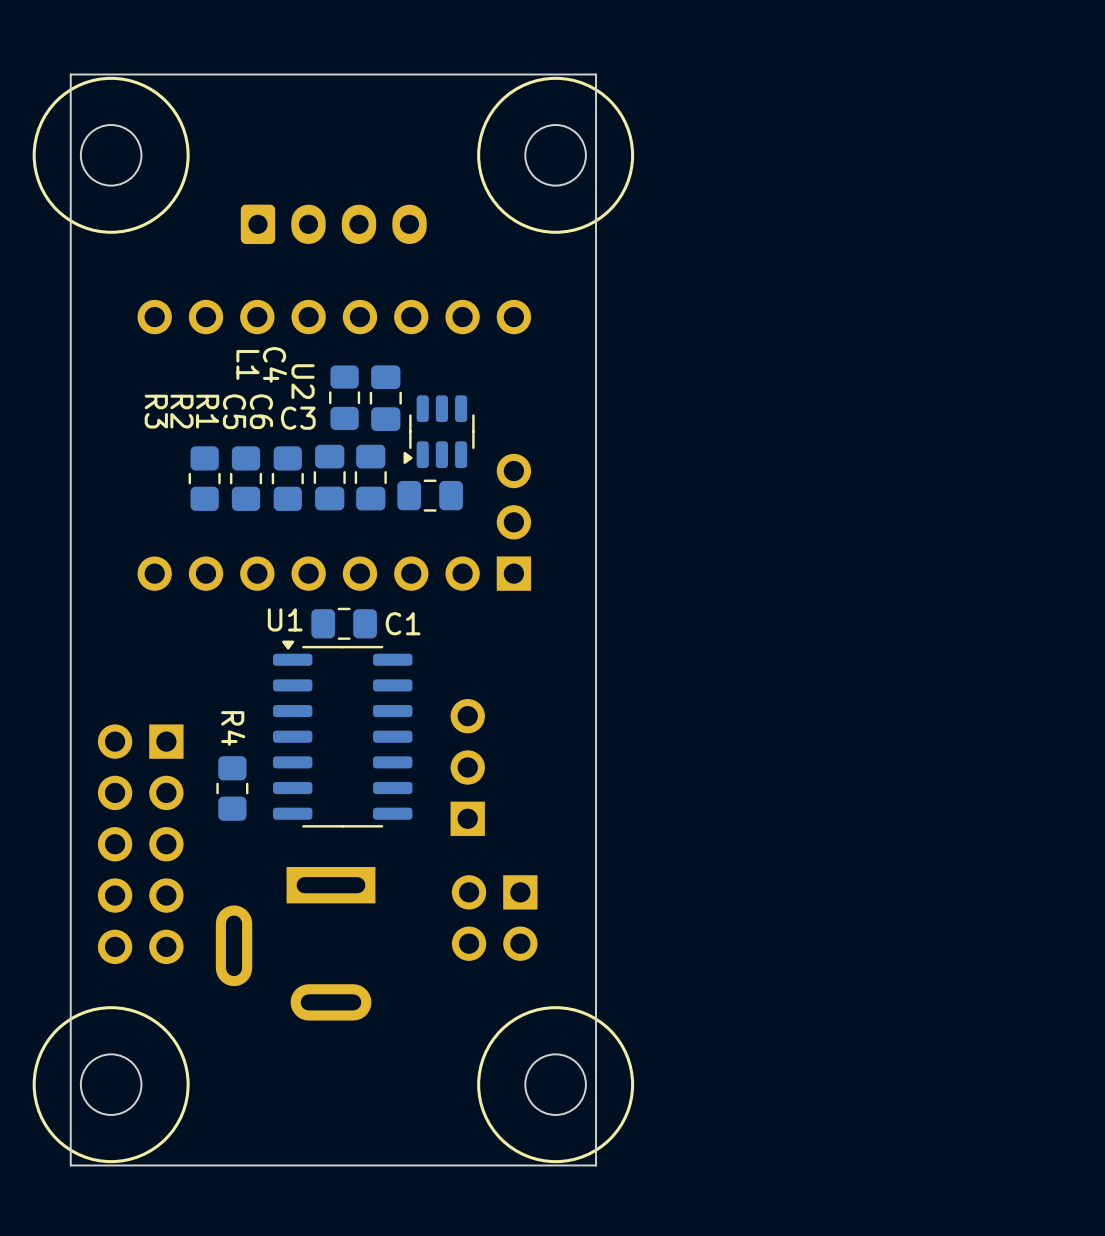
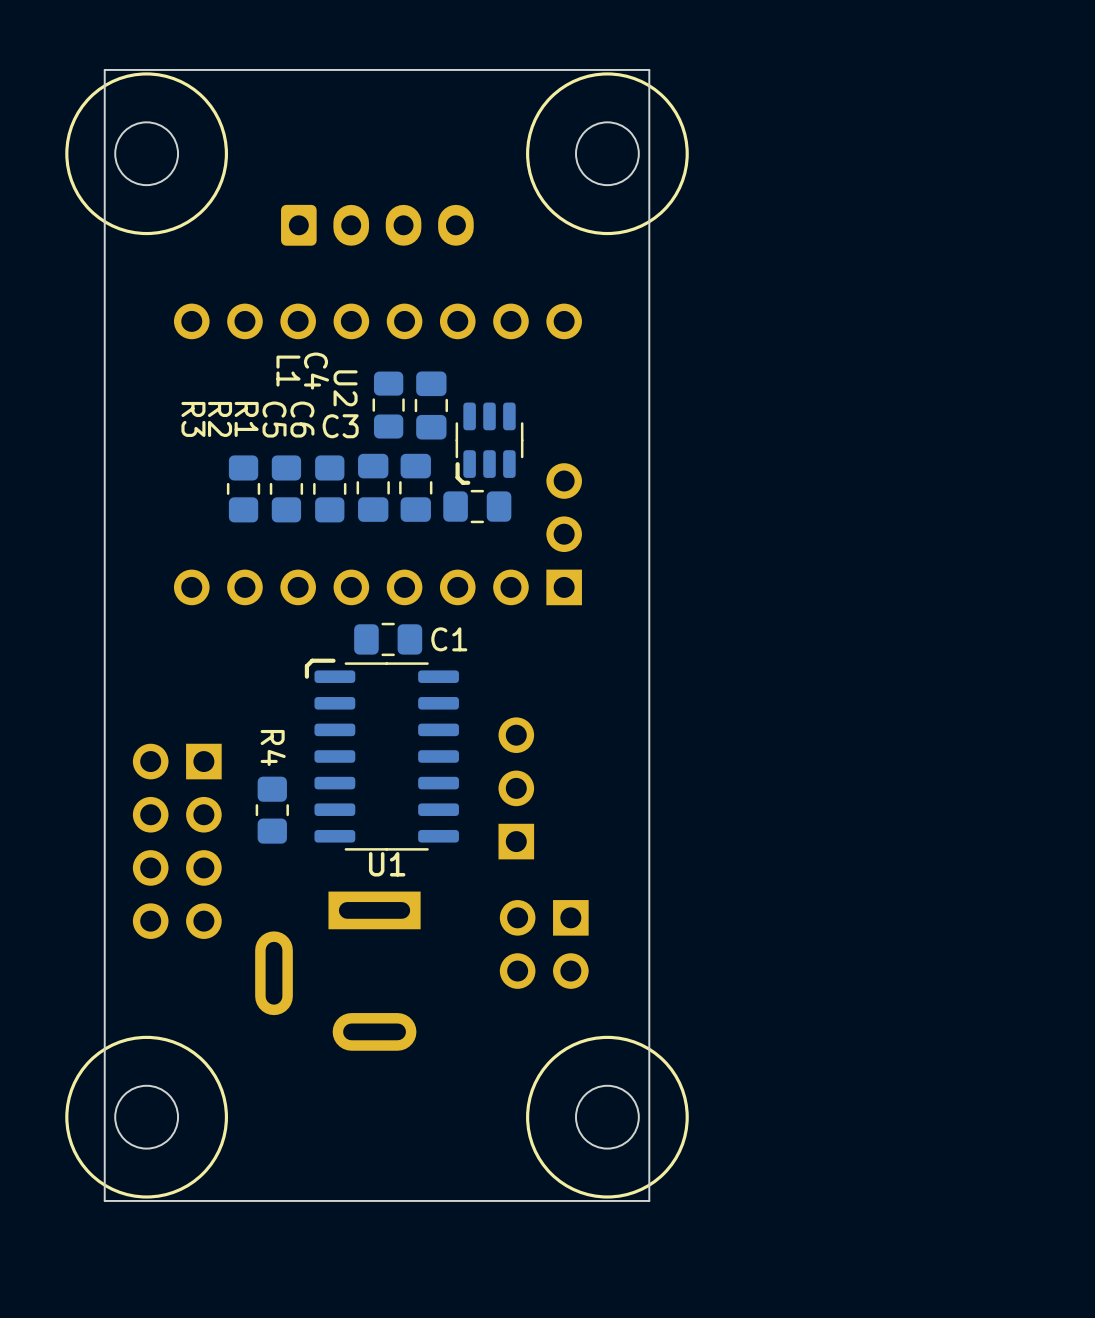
U2 footprint: [403, 395, 475, 469] -> [455, 402, 524, 485]
U1 name position: U1 (285, 619) -> U1 (387, 864)
U1 footprint: [273, 640, 413, 828] -> [304, 658, 459, 851]
part: (140, 844) -> none

